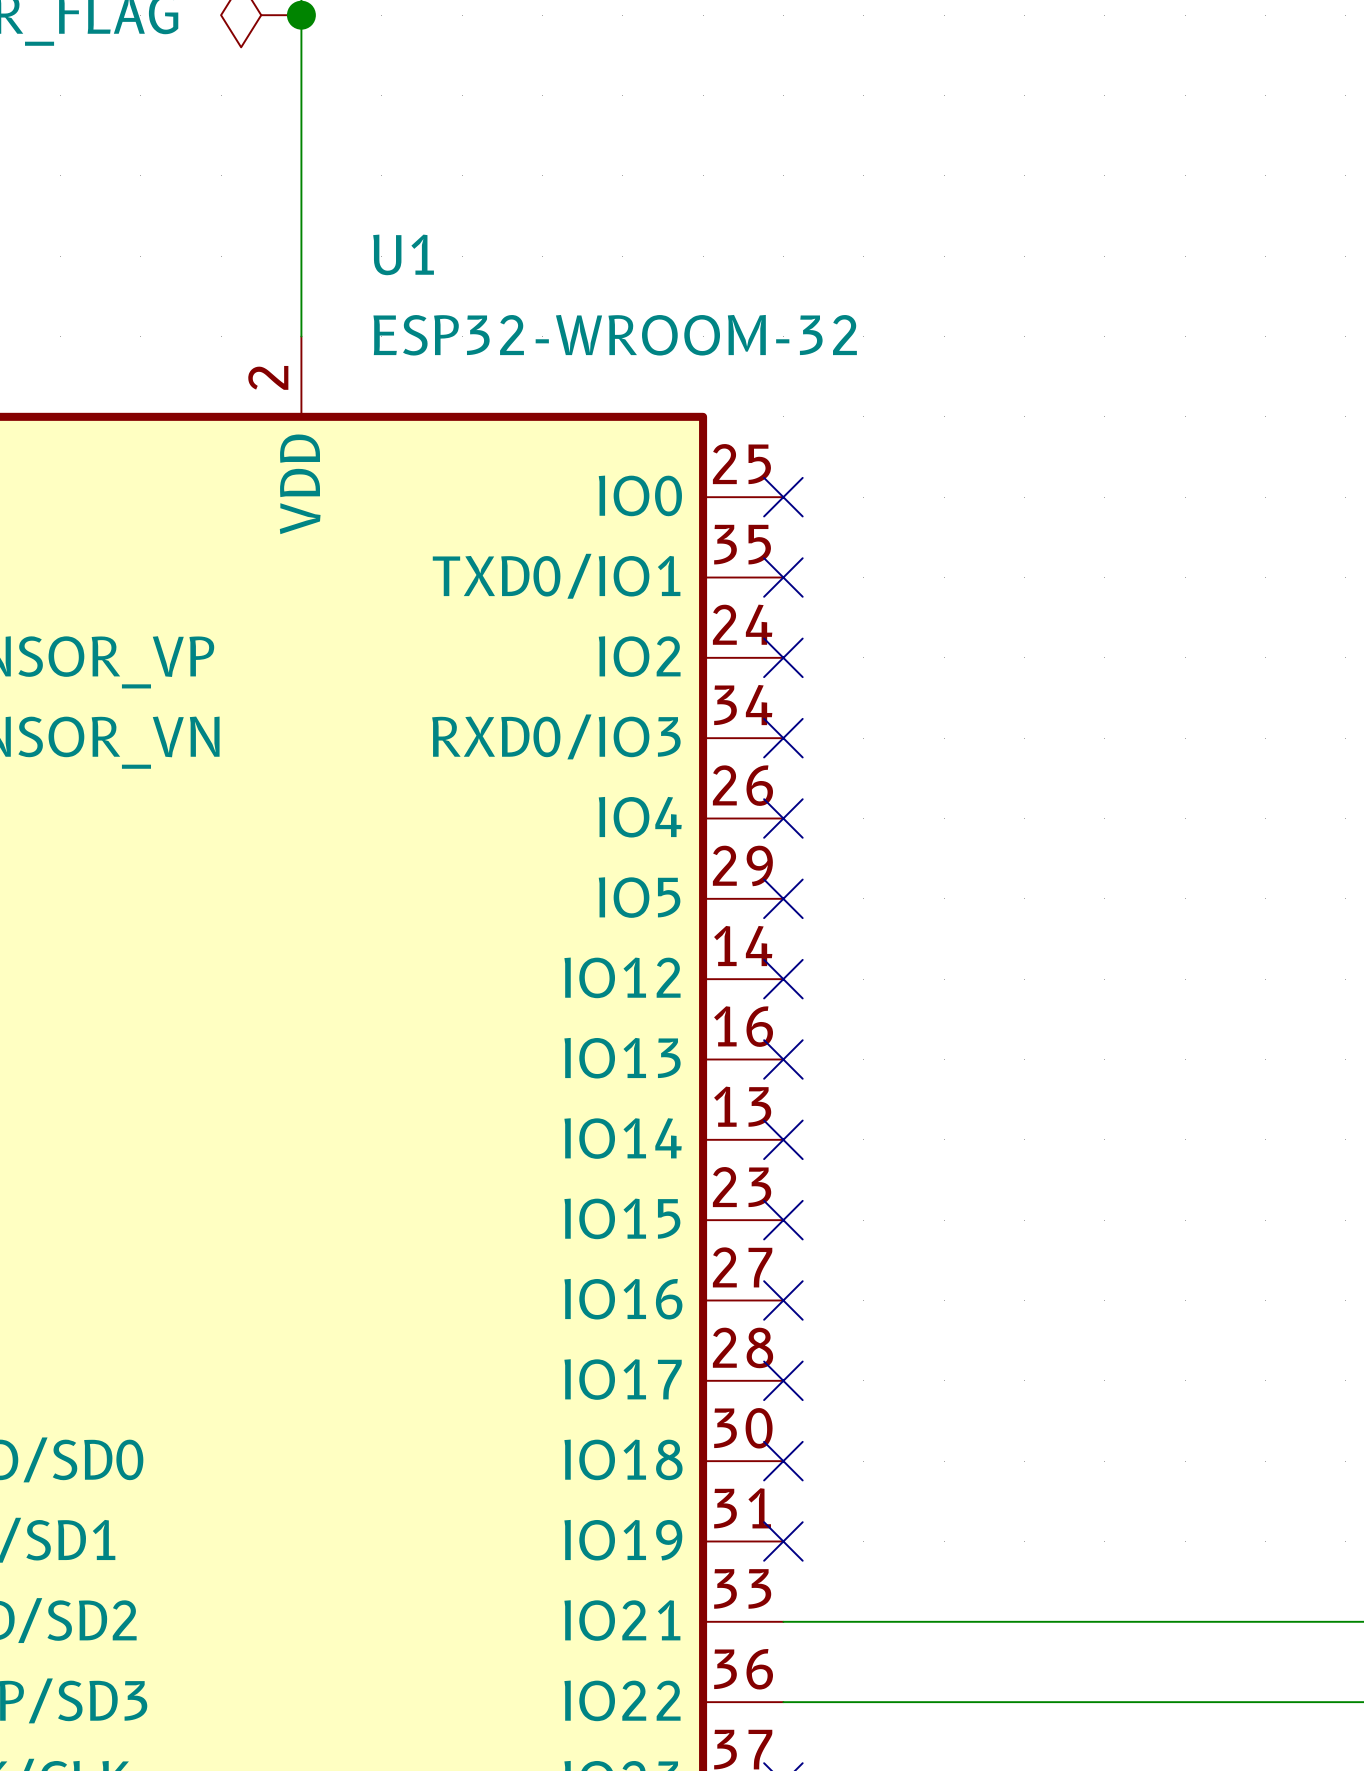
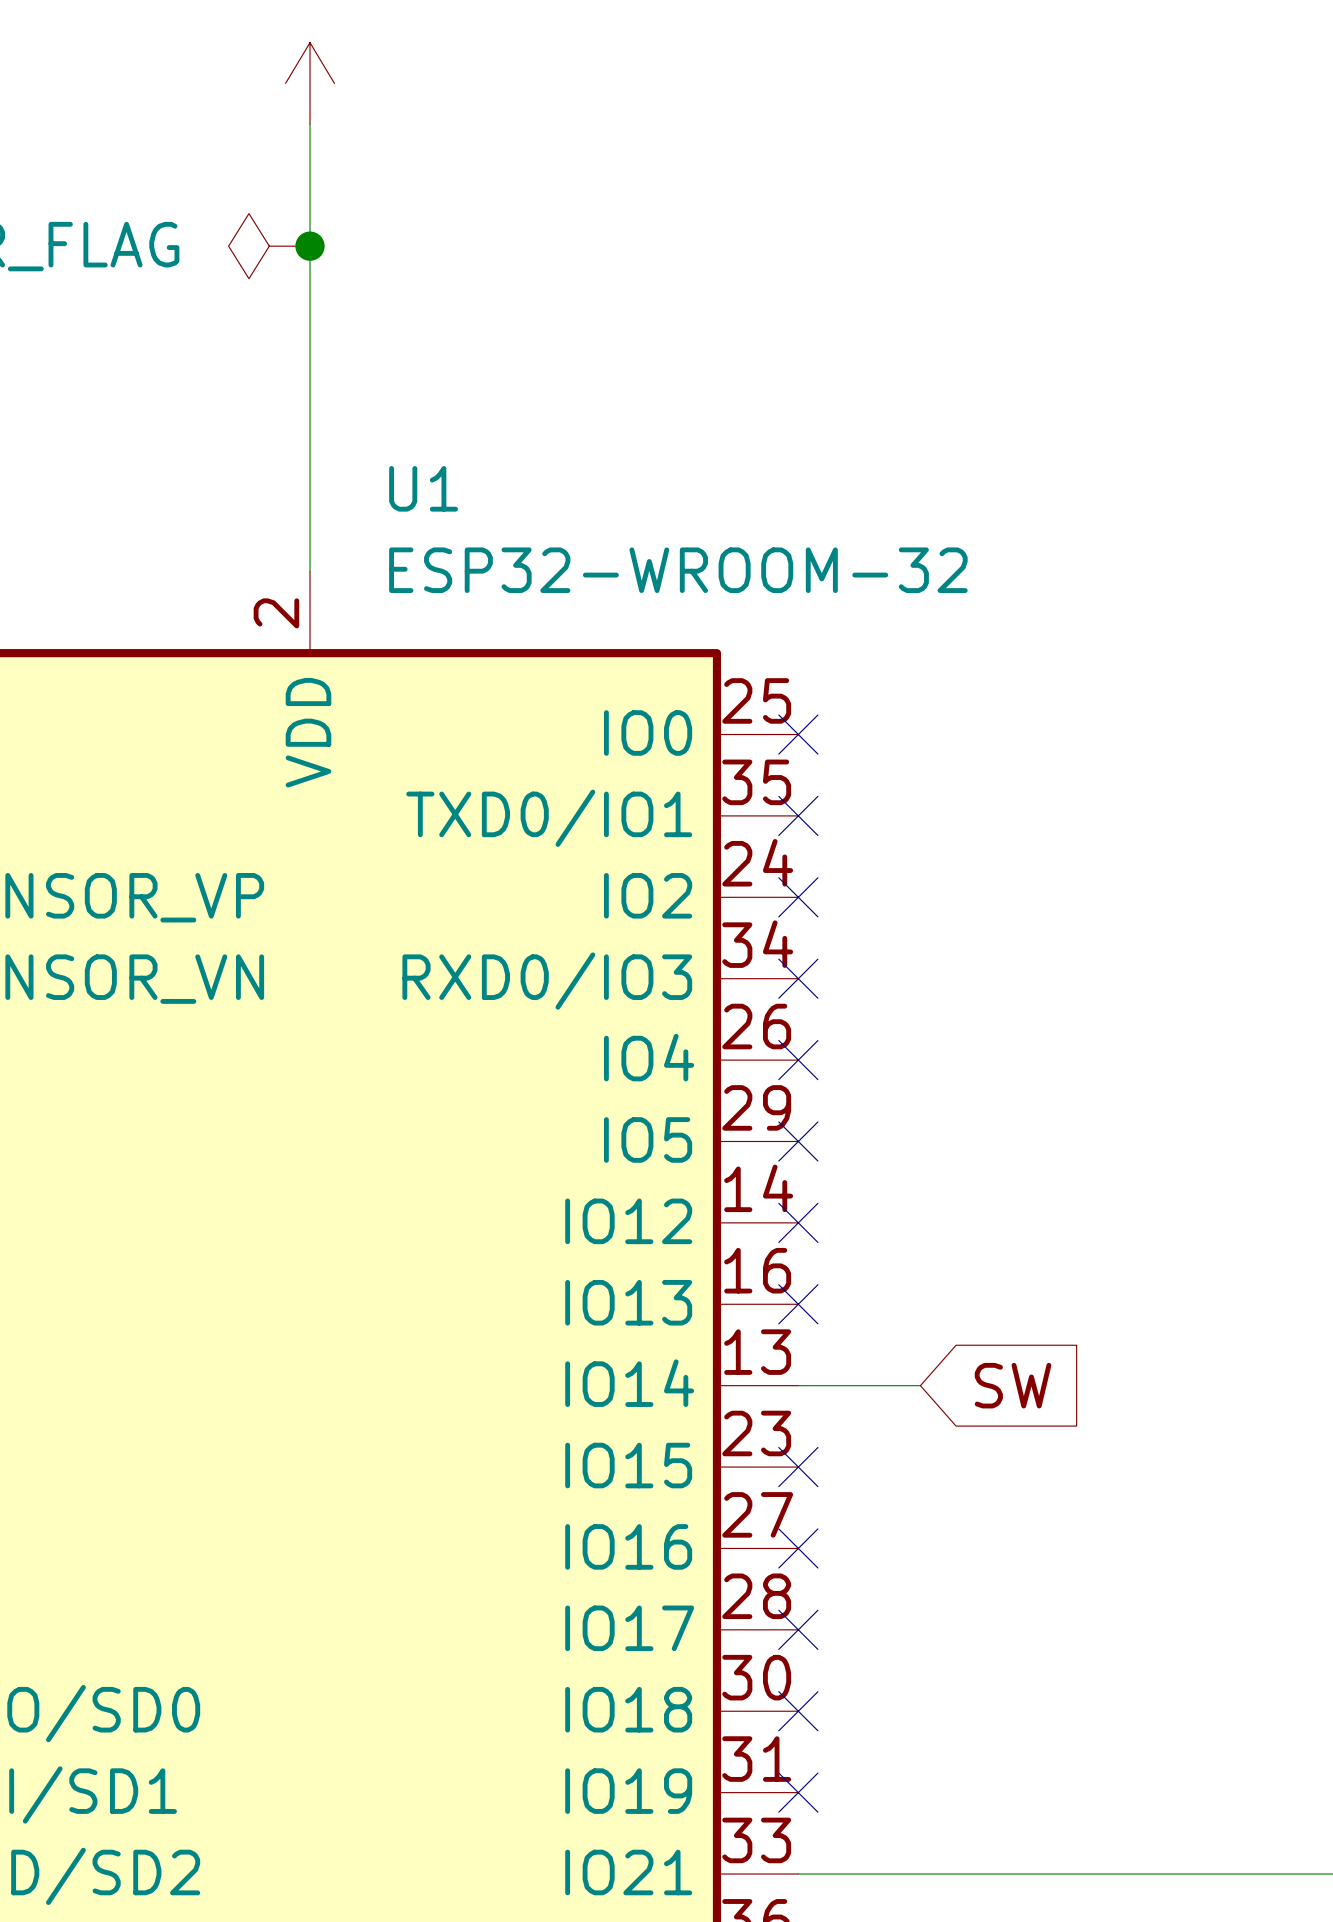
wire: none -> (798, 1385) (920, 1385)
no-connect mark: (783, 1139) -> none
global label: none -> SW (1013, 1385)

